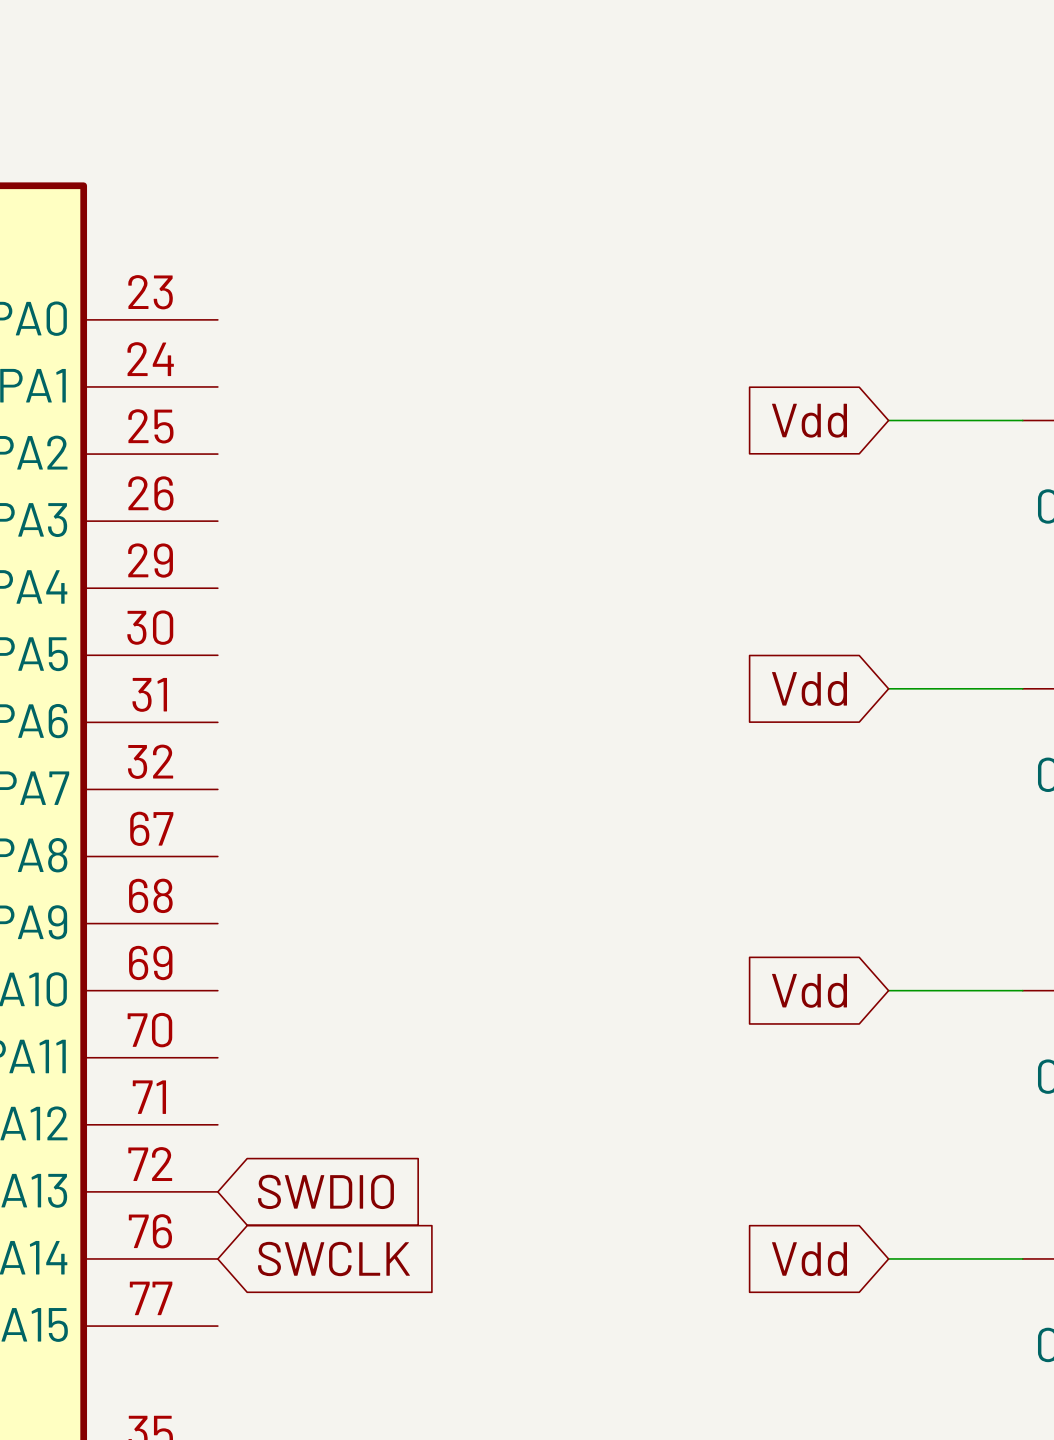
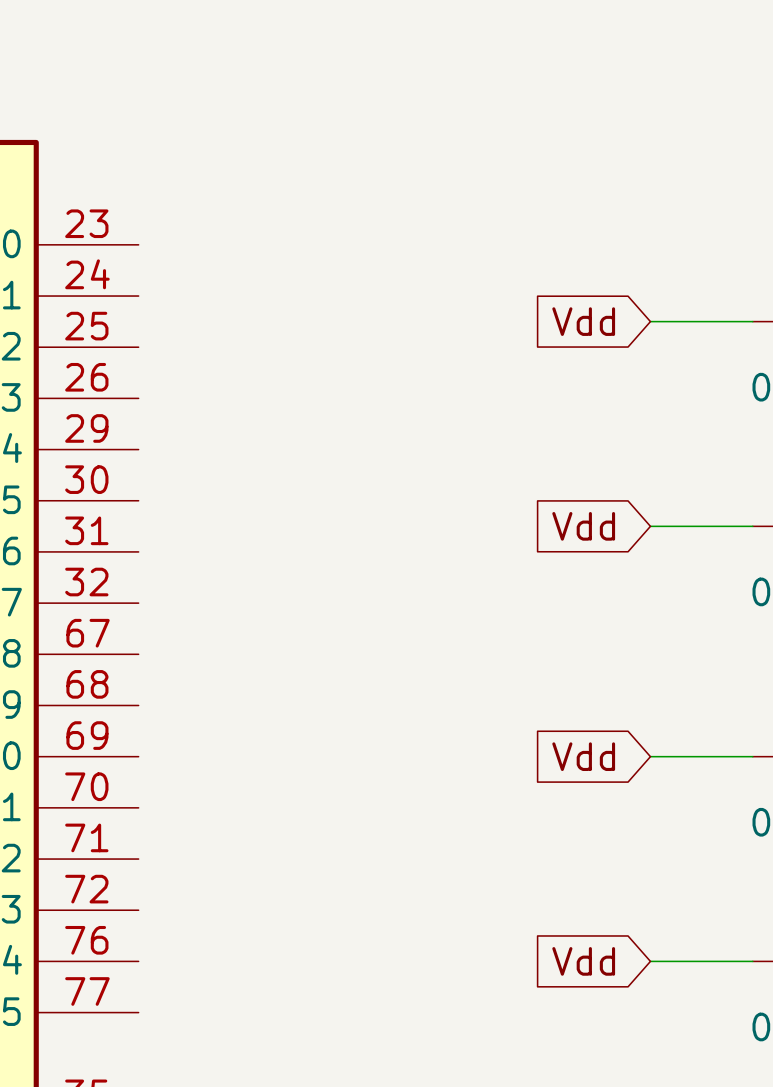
global label: SWDIO (325, 1191) -> none
global label: SWCLK (333, 1259) -> none

